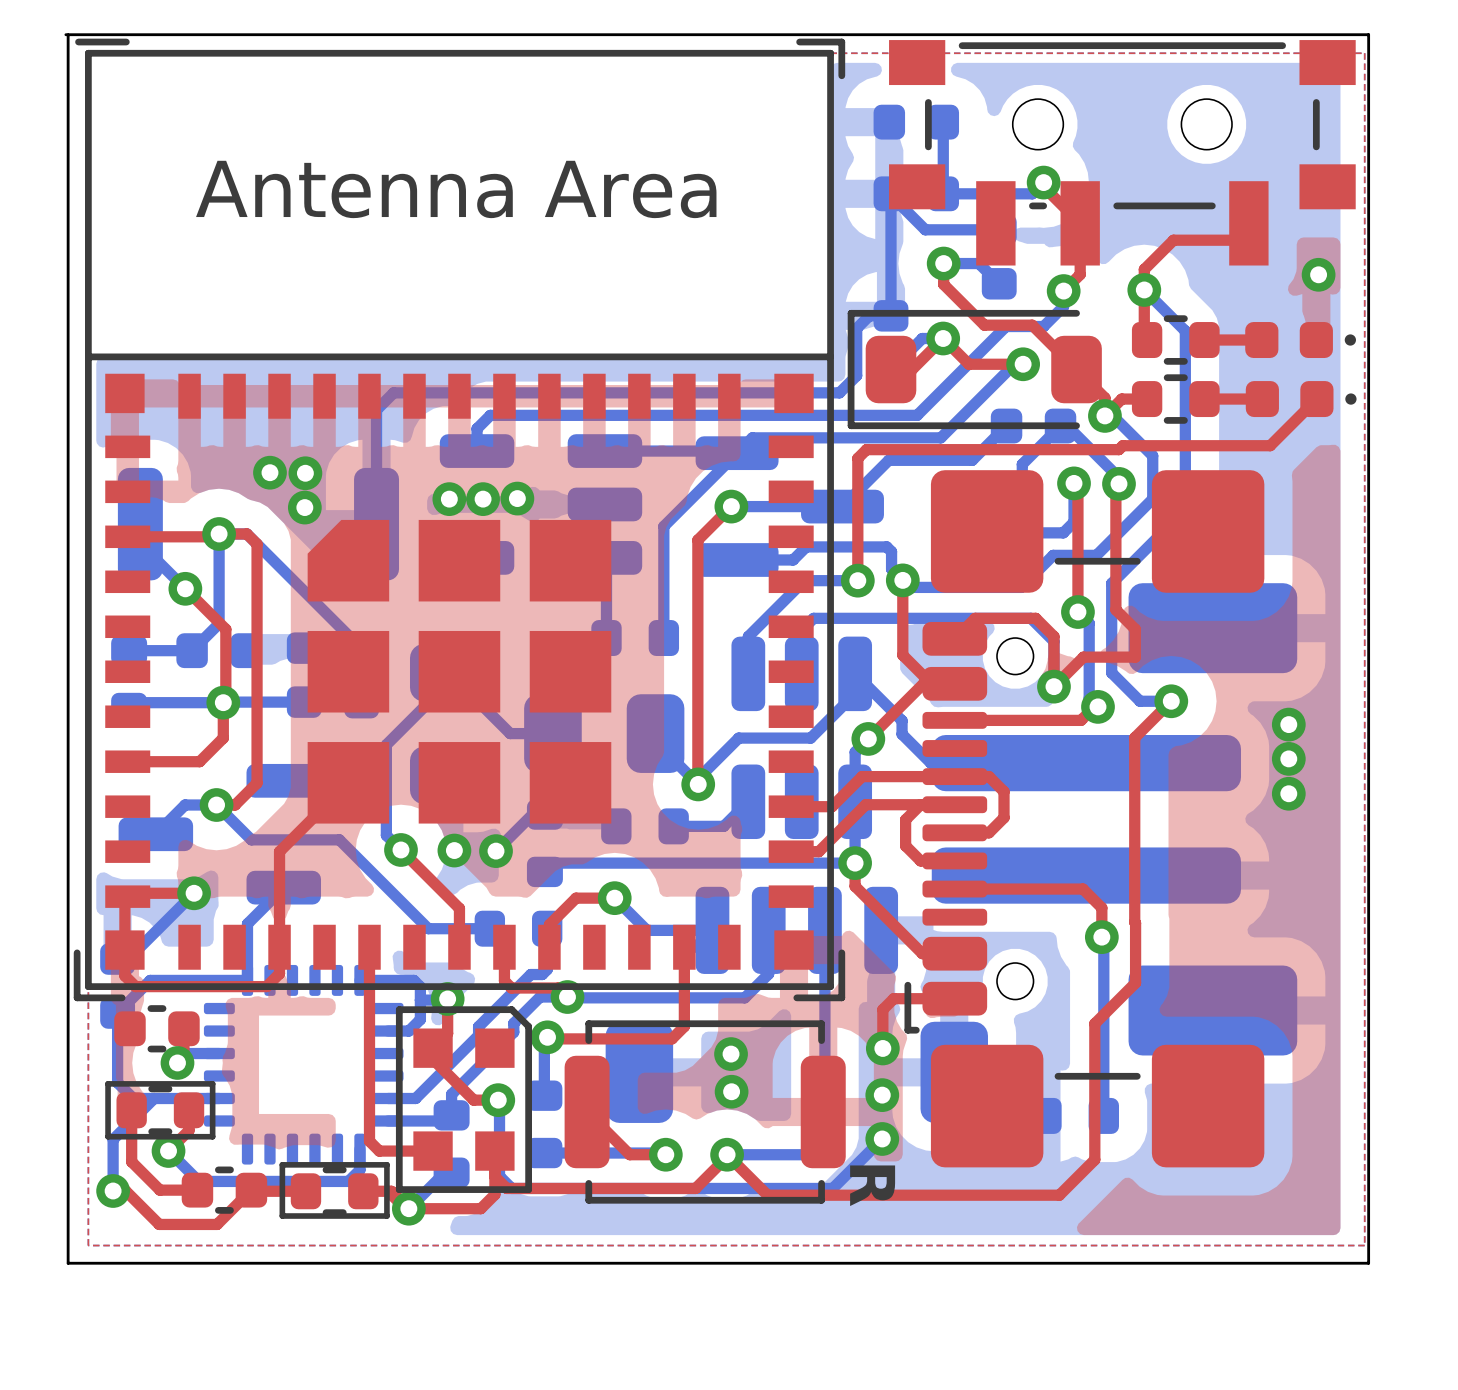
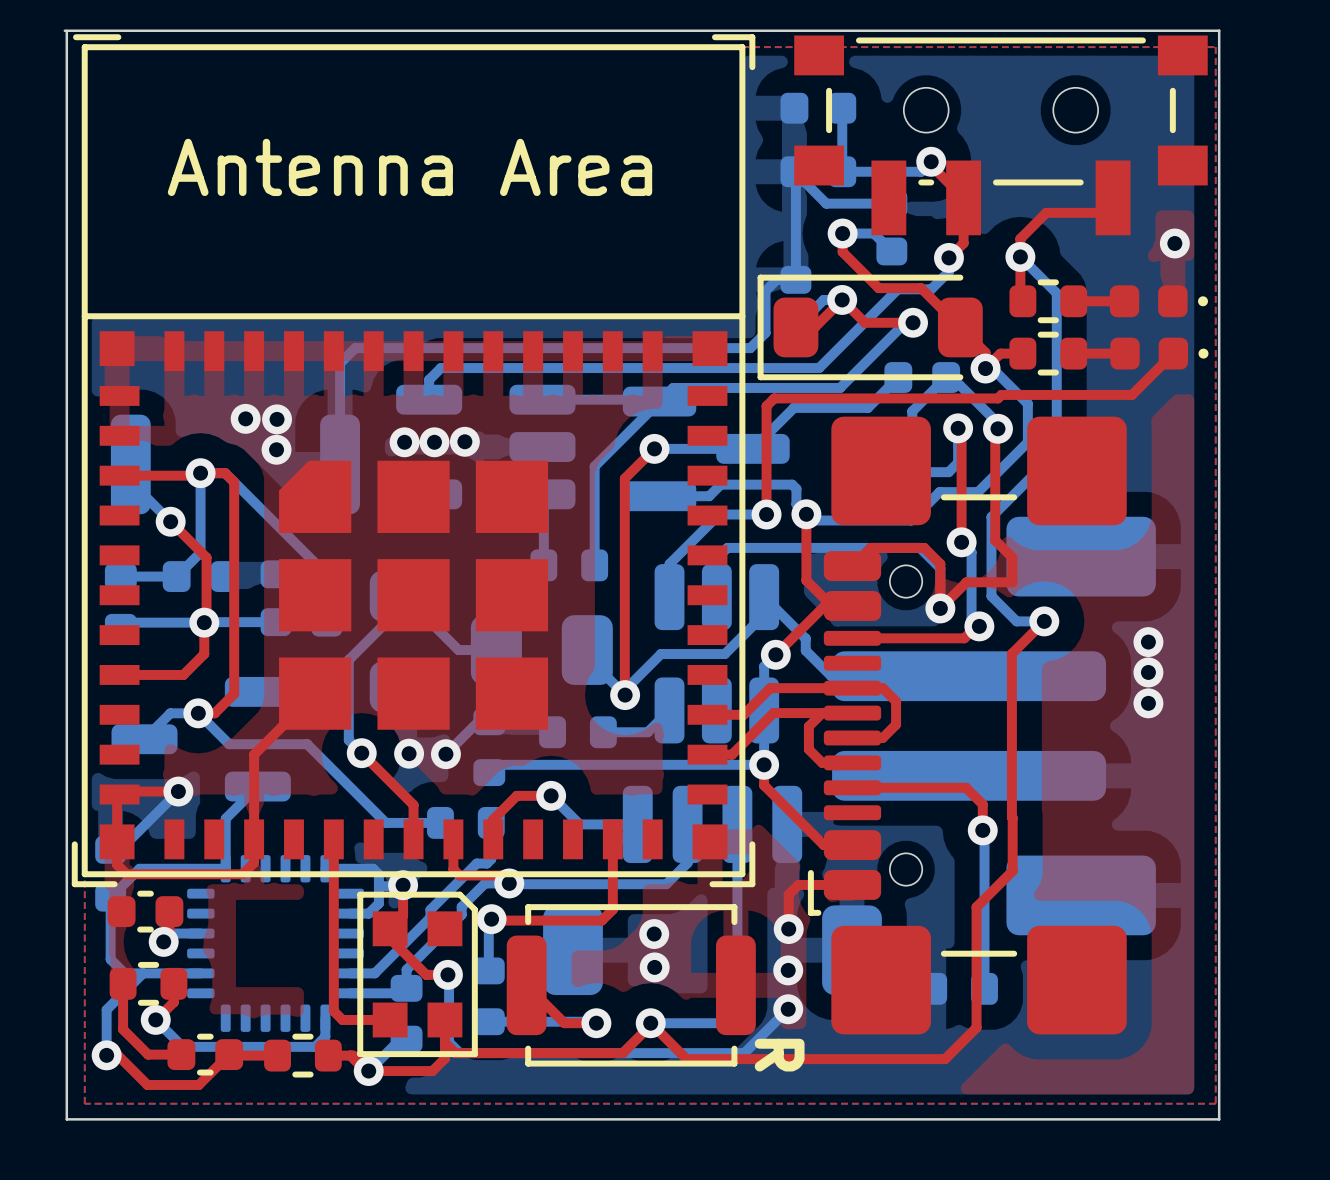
line: (108, 1083) (212, 1083) (212, 1136) (108, 1136) (108, 1083) -> none
line: (282, 1164) (386, 1164) (386, 1216) (282, 1216) (282, 1164) -> none

